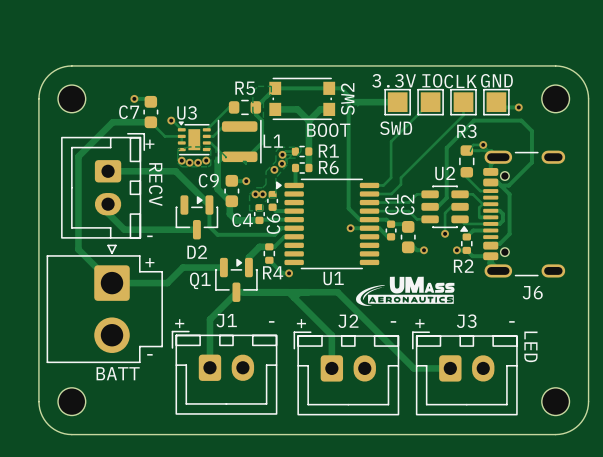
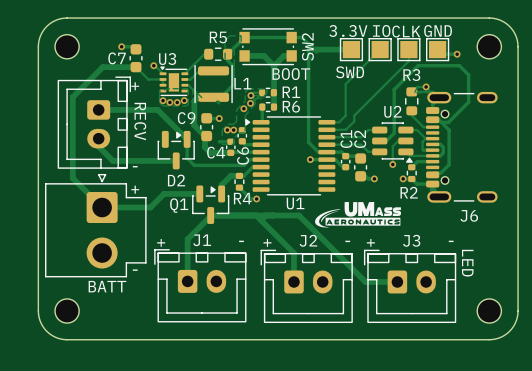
track: none -> (219, 141) (230, 141)

